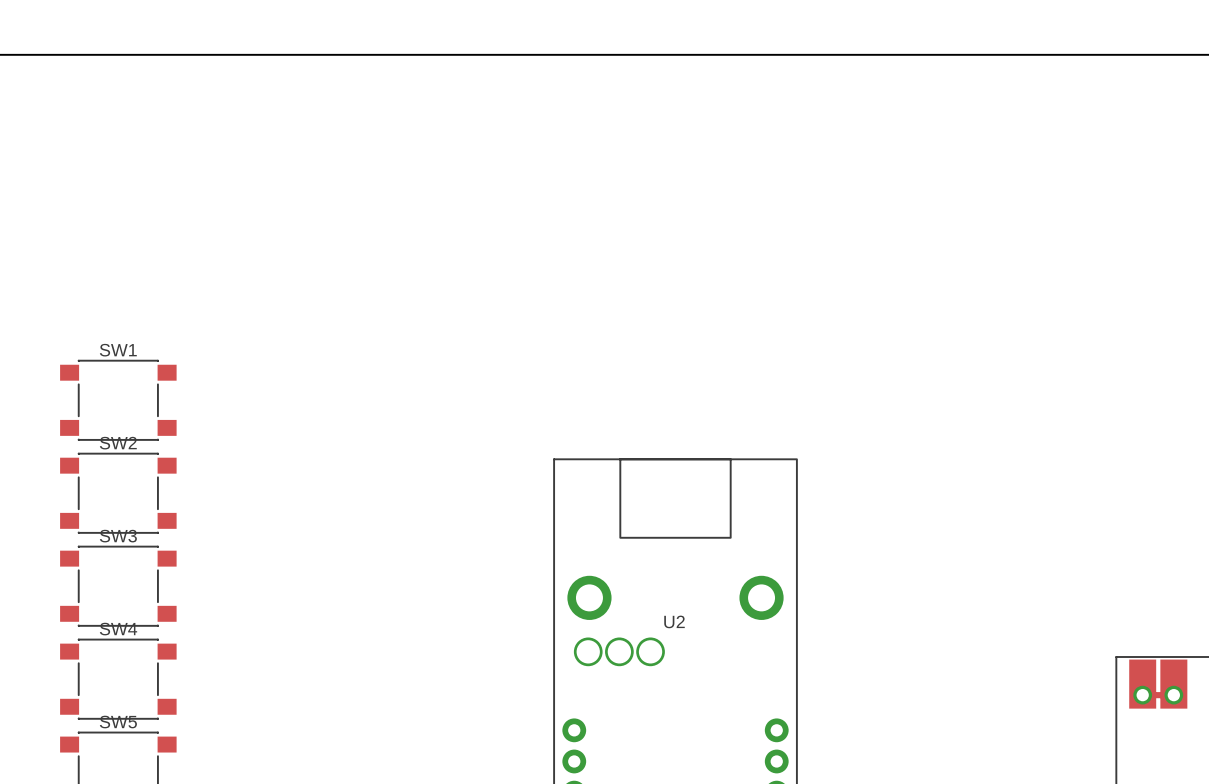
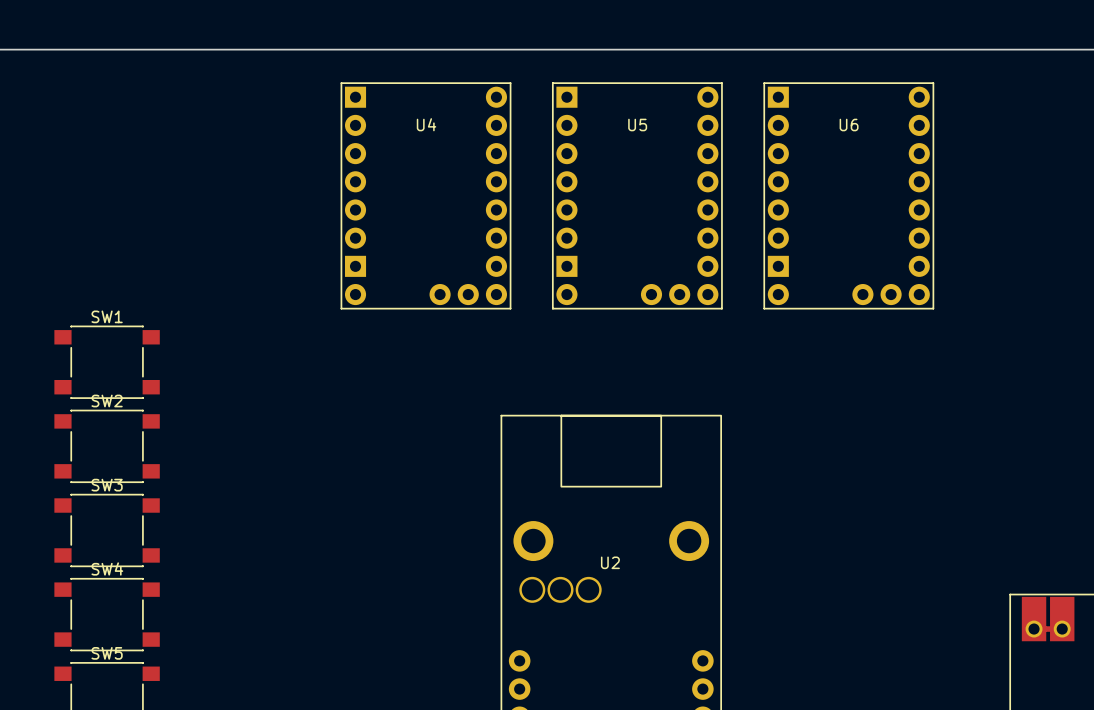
U4: none -> (425, 195)
U5: none -> (637, 195)
U6: none -> (848, 195)

